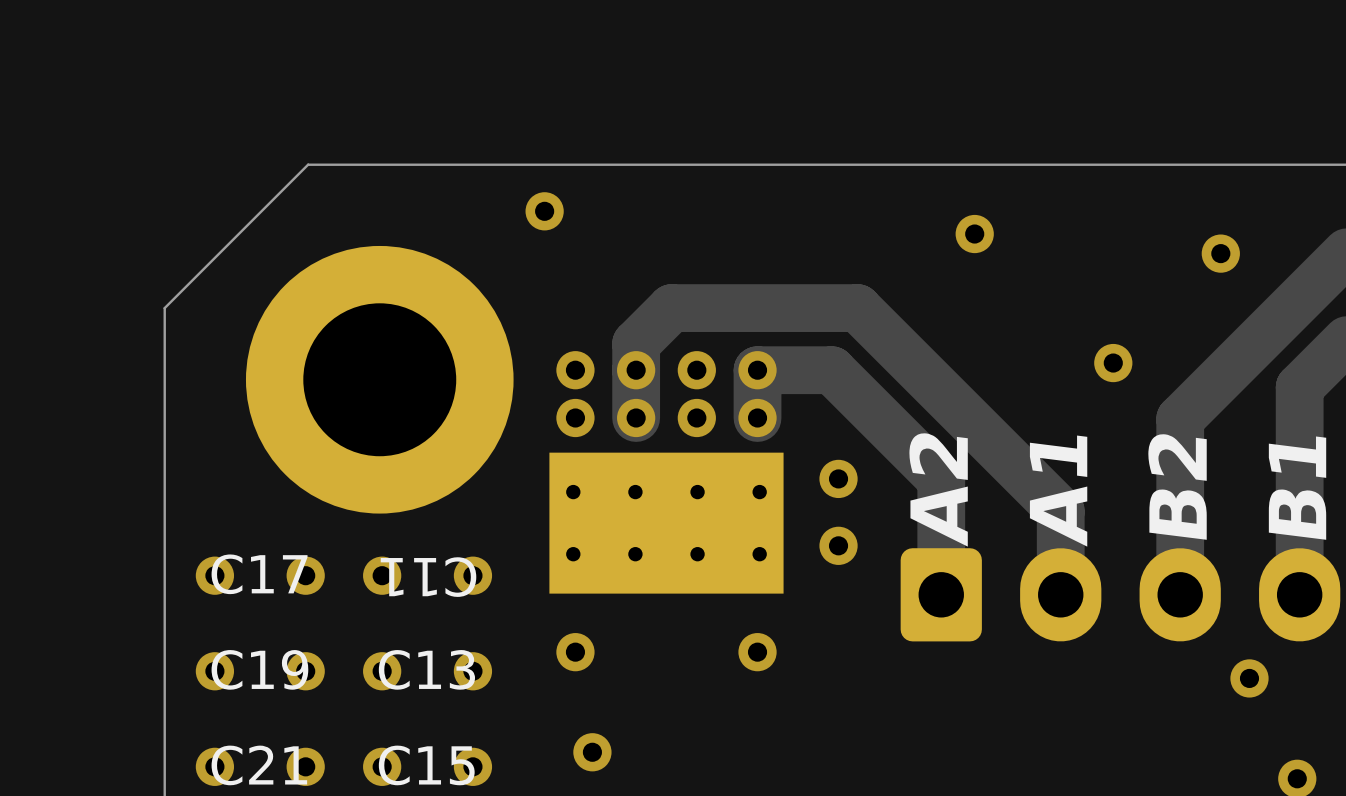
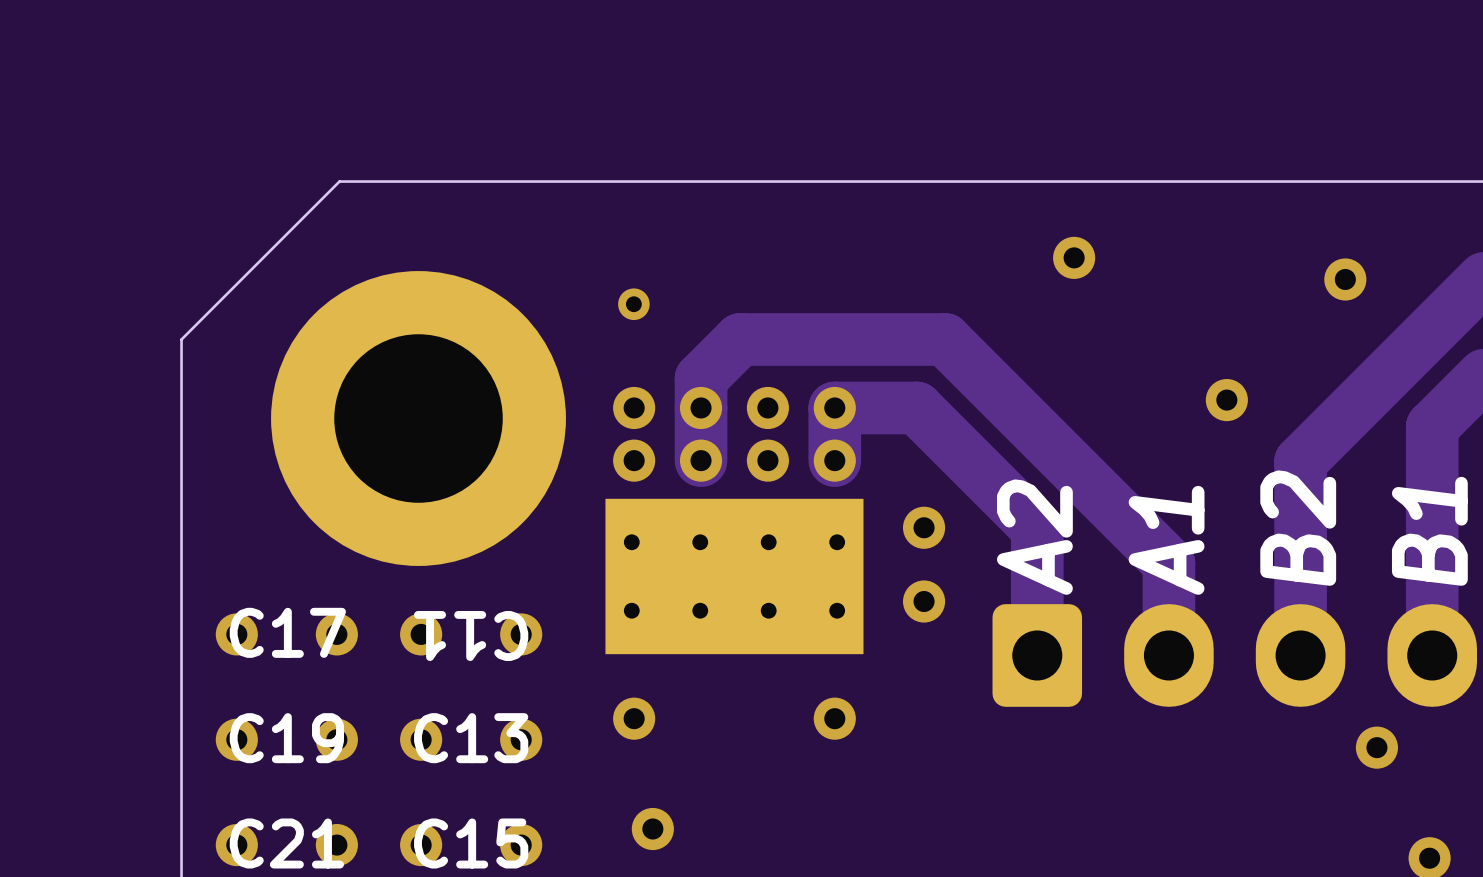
via: (544, 211) -> none
via: none -> (633, 304)

